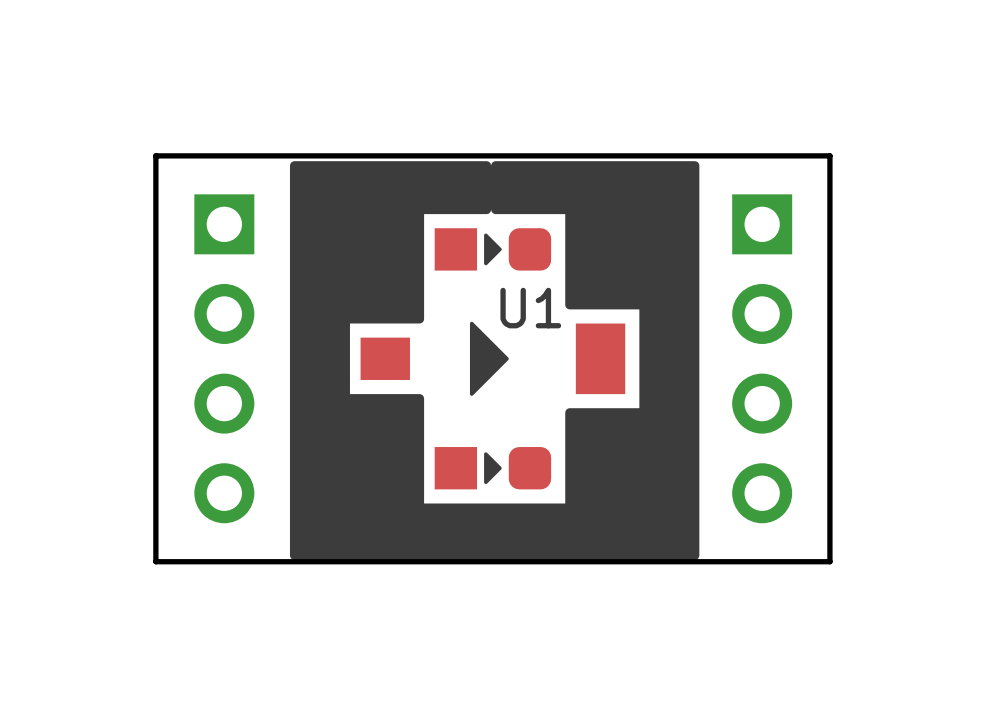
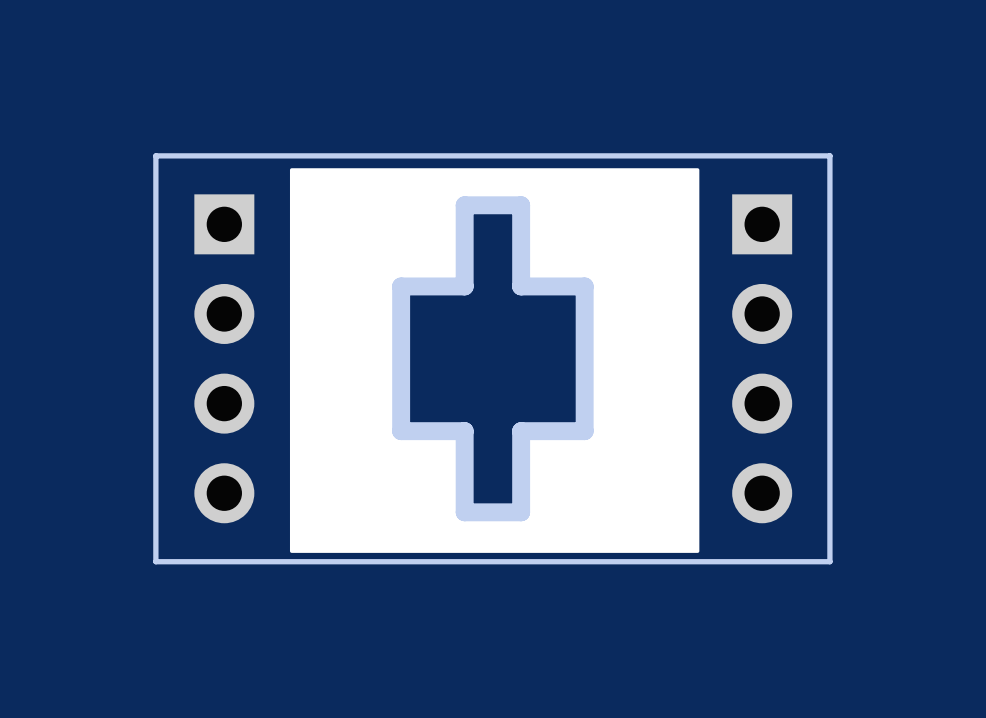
drawing shape: [289, 161, 700, 560] -> [289, 168, 700, 553]
board edge: none -> (464, 205) (464, 286) (401, 286) (401, 431) (464, 431) (464, 512) (521, 512) (521, 431) (584, 431) (584, 286) (521, 286) (521, 205) (464, 205)
U1: (492, 358) -> none

